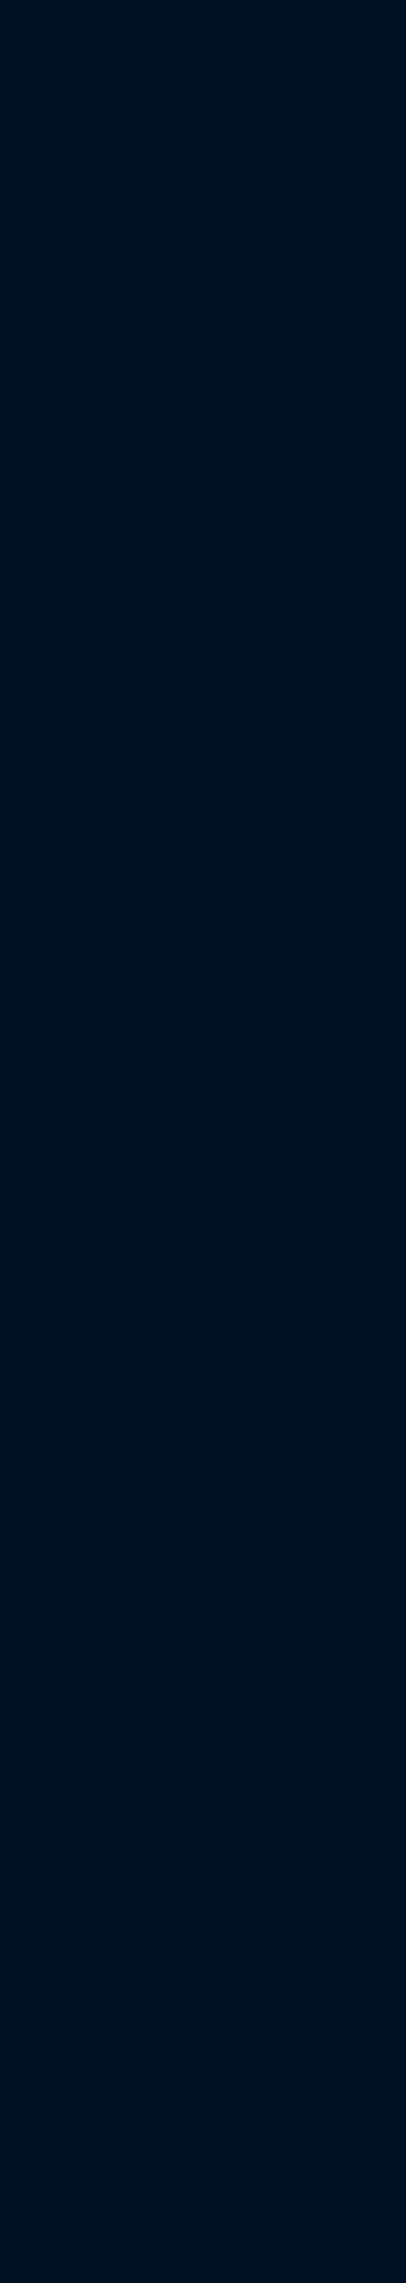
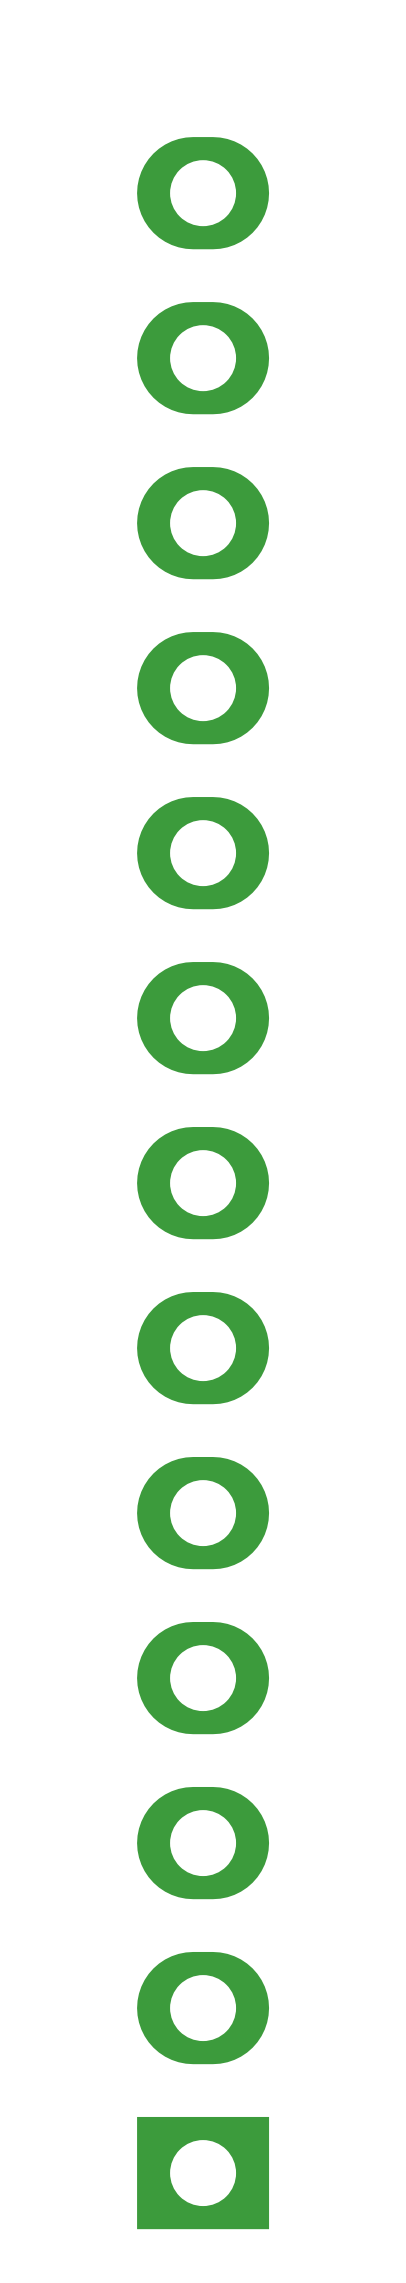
part: none -> (203, 1183)

